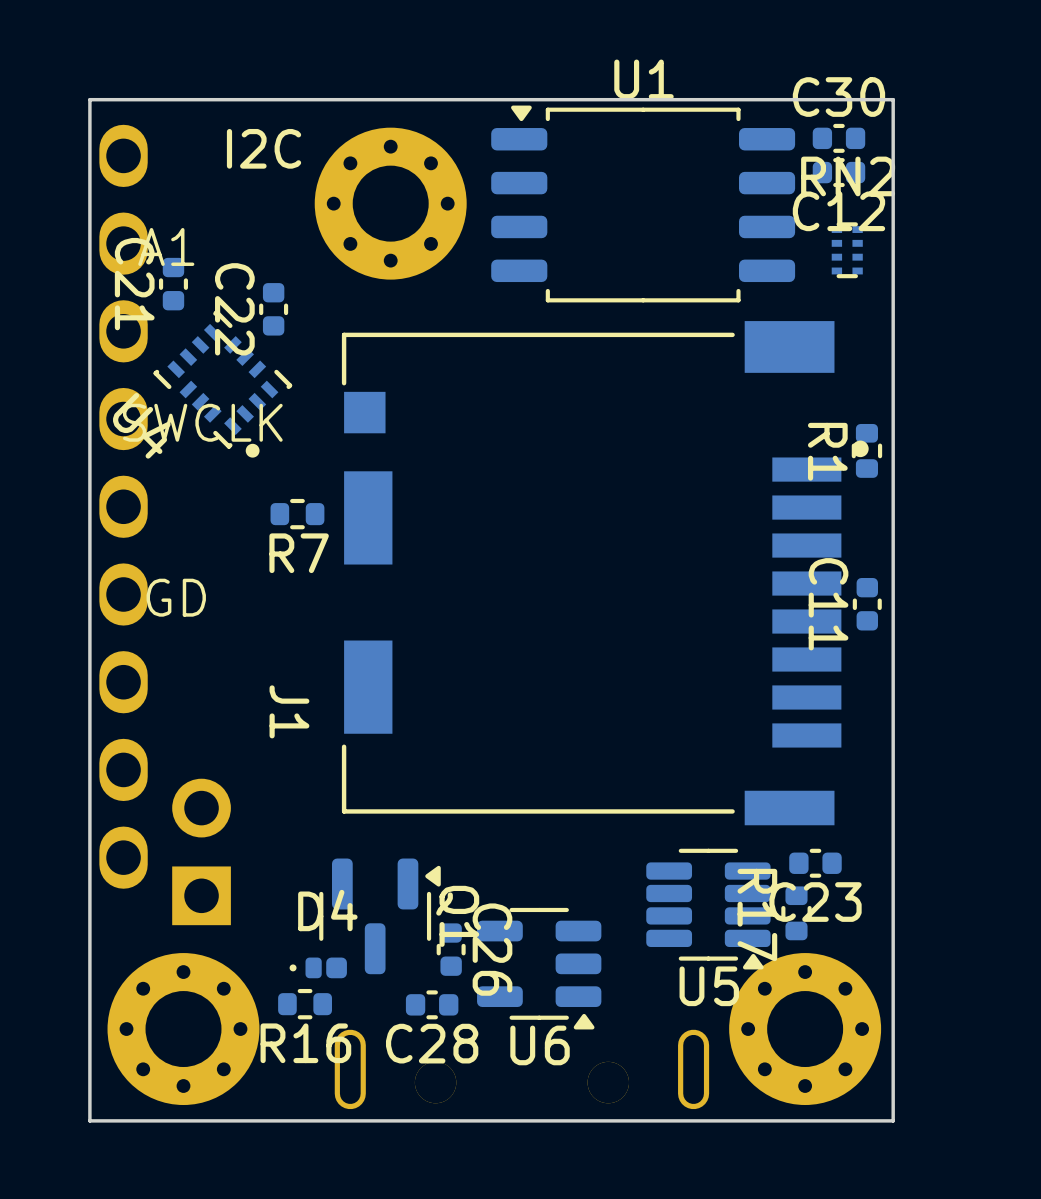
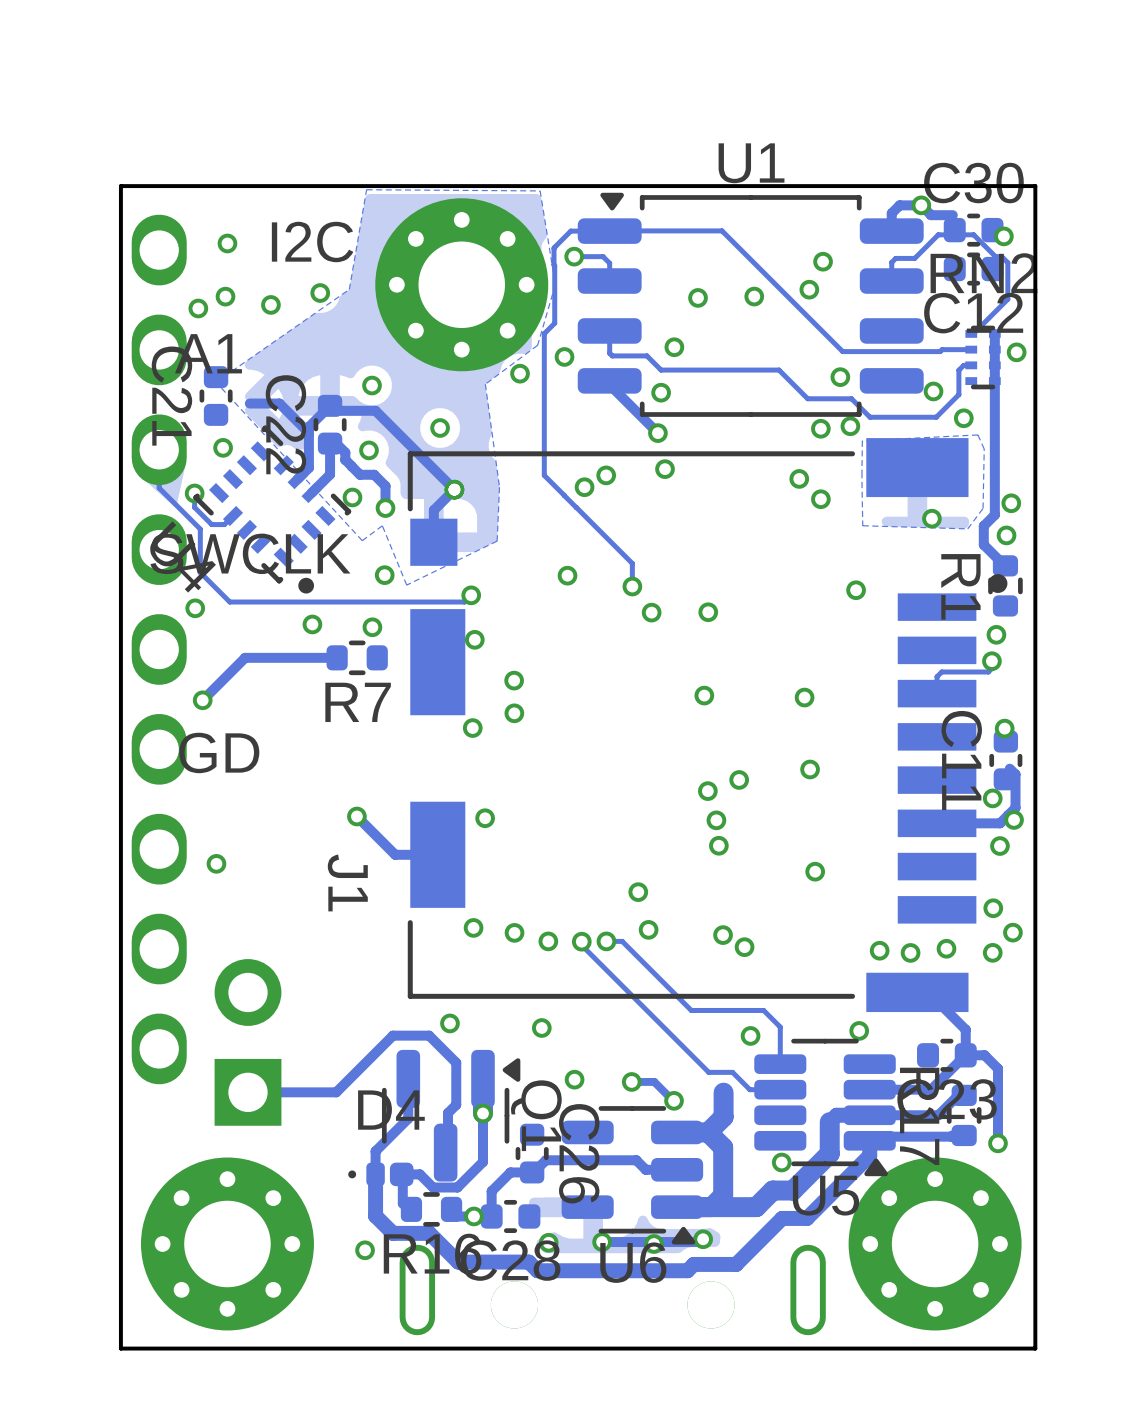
zone outline: none -> (366, 189) (540, 190) (555, 284) (537, 345) (485, 384) (499, 487) (497, 541) (406, 585) (382, 525) (362, 540) (216, 382) (349, 289) (366, 189)
via: none -> (921, 205)
track: none -> (952, 215) (931, 215) (921, 205) (899, 205) (891, 213) (891, 231)
via: none -> (1003, 236)
via: none -> (227, 243)
track: none -> (574, 256) (603, 256) (609, 263) (609, 281)
via: none -> (574, 256)
via: none -> (823, 261)
track: none -> (891, 281) (891, 262) (895, 258) (914, 258) (938, 234) (973, 234) (995, 256) (1001, 256) (1007, 262) (1007, 299) (971, 333)
via: none -> (809, 289)
via: none -> (320, 293)
via: none -> (225, 296)
via: none -> (754, 296)
via: none -> (698, 297)
part position: (390, 203) -> (461, 284)
via: none -> (270, 304)
via: none -> (198, 308)
track: none -> (609, 330) (609, 353) (612, 355) (646, 355) (661, 370) (779, 370) (807, 398) (851, 398) (869, 417) (936, 417) (958, 394) (958, 370) (963, 365) (971, 365)
track: none -> (994, 333) (994, 514) (983, 526) (983, 544) (1004, 565)
via: none -> (674, 347)
track: none -> (971, 349) (842, 351) (722, 230) (570, 231) (553, 248) (554, 323) (544, 333) (544, 475) (632, 563) (632, 586)
via: none -> (1016, 352)
via: none -> (564, 356)
via: none -> (520, 373)
via: none -> (840, 377)
track: none -> (609, 380) (609, 384) (657, 433)
via: none -> (372, 385)
via: none -> (933, 391)
via: none -> (661, 392)
track: none -> (249, 403) (279, 403) (308, 432)
via: none -> (963, 418)
via: none -> (850, 426)
via: none -> (440, 428)
via: none -> (820, 428)
via: none -> (657, 433)
zone outline: none -> (977, 434) (862, 440) (862, 525) (967, 528) (983, 508) (984, 449) (977, 434)
via: none -> (223, 447)
track: none -> (159, 448) (159, 488) (200, 529) (200, 572) (229, 602) (464, 602) (471, 595)
via: none -> (369, 450)
via: none -> (665, 469)
via: none -> (606, 475)
via: none -> (799, 478)
track: none -> (297, 479) (308, 467) (308, 427) (330, 405) (335, 410) (375, 410) (454, 489) (433, 510) (433, 542)
via: none -> (584, 487)
via: none -> (454, 489)
track: none -> (194, 493) (194, 507) (211, 524) (224, 524) (233, 515)
via: none -> (194, 493)
track: none -> (311, 493) (330, 474) (330, 443) (336, 443) (345, 452) (345, 460) (360, 474) (374, 474) (385, 486) (385, 508)
via: none -> (352, 497)
via: none -> (820, 499)
via: none -> (1011, 503)
via: none -> (385, 508)
via: none -> (931, 518)
via: none -> (1006, 535)
via: none -> (384, 575)
via: none -> (567, 575)
via: none -> (632, 586)
via: none -> (856, 590)
via: none -> (471, 595)
via: none -> (195, 608)
via: none -> (651, 612)
via: none -> (708, 612)
via: none -> (312, 624)
via: none -> (372, 627)
via: none -> (996, 634)
via: none -> (474, 639)
track: none -> (337, 657) (245, 657) (202, 700)
track: none -> (991, 661) (991, 668) (988, 671) (941, 671) (937, 676) (937, 693)
via: none -> (991, 661)
via: none -> (514, 680)
via: none -> (704, 695)
via: none -> (804, 697)
via: none -> (202, 700)
via: none -> (514, 713)
via: none -> (472, 728)
via: none -> (1004, 728)
track: none -> (1009, 768) (1015, 774) (1015, 807) (1000, 823) (937, 823)
via: none -> (810, 769)
via: none -> (739, 779)
via: none -> (707, 791)
via: none -> (992, 798)
track: none -> (356, 816) (395, 854) (437, 854)
via: none -> (356, 816)
via: none -> (485, 818)
via: none -> (716, 820)
via: none -> (1014, 819)
via: none -> (718, 845)
via: none -> (999, 846)
via: none -> (216, 863)
via: none -> (815, 871)
via: none -> (638, 892)
via: none -> (993, 908)
via: none -> (473, 927)
via: none -> (648, 929)
via: none -> (514, 932)
via: none -> (1012, 932)
via: none -> (723, 935)
via: none -> (548, 941)
track: none -> (581, 941) (581, 945) (708, 1072) (732, 1072) (749, 1089) (780, 1089)
via: none -> (581, 941)
track: none -> (606, 941) (622, 941) (691, 1010) (763, 1010) (780, 1027) (780, 1064)
via: none -> (606, 941)
via: none -> (744, 947)
via: none -> (946, 948)
via: none -> (879, 950)
via: none -> (910, 952)
via: none -> (992, 952)
track: none -> (928, 992) (965, 1029) (965, 1055)
via: none -> (449, 1023)
via: none -> (541, 1028)
via: none -> (859, 1030)
via: none -> (750, 1035)
track: none -> (408, 1078) (408, 1118) (375, 1151) (375, 1215) (392, 1233) (429, 1233) (458, 1262) (528, 1262) (537, 1270) (687, 1270) (693, 1264) (736, 1264) (782, 1218) (806, 1218) (869, 1155) (869, 1140) (873, 1136) (964, 1135)
via: none -> (574, 1079)
track: none -> (631, 1081) (654, 1081) (674, 1100)
via: none -> (631, 1081)
track: none -> (869, 1089) (931, 1089) (965, 1055) (984, 1055) (997, 1068) (997, 1143)
track: none -> (248, 1092) (336, 1092) (392, 1035) (429, 1035) (456, 1062) (456, 1104) (448, 1113) (448, 1150) (445, 1152)
track: none -> (723, 1092) (723, 1117) (708, 1132)
track: none -> (964, 1095) (958, 1095) (938, 1115) (836, 1115) (829, 1122) (829, 1153) (792, 1190) (772, 1190) (756, 1207) (677, 1207)
via: none -> (674, 1100)
R17 position: (796, 913) -> (964, 1115)
track: none -> (482, 1113) (482, 1078) (482, 1161) (457, 1187) (433, 1187) (419, 1174) (401, 1174) (402, 1203) (410, 1210)
via: none -> (482, 1113)
track: none -> (708, 1132) (723, 1147) (723, 1195) (711, 1207)
via: none -> (997, 1143)
via: none -> (781, 1162)
track: none -> (677, 1169) (645, 1169) (636, 1160) (545, 1160) (533, 1172) (510, 1172) (491, 1191) (491, 1216) (455, 1216) (451, 1211)
R16 position: (305, 1004) -> (431, 1209)
via: none -> (473, 1216)
track: none -> (703, 1239) (700, 1242) (655, 1242) (654, 1243) (652, 1242) (602, 1242)
via: none -> (703, 1239)
via: none -> (548, 1242)
via: none -> (602, 1242)
via: none -> (654, 1243)
via: none -> (365, 1250)

